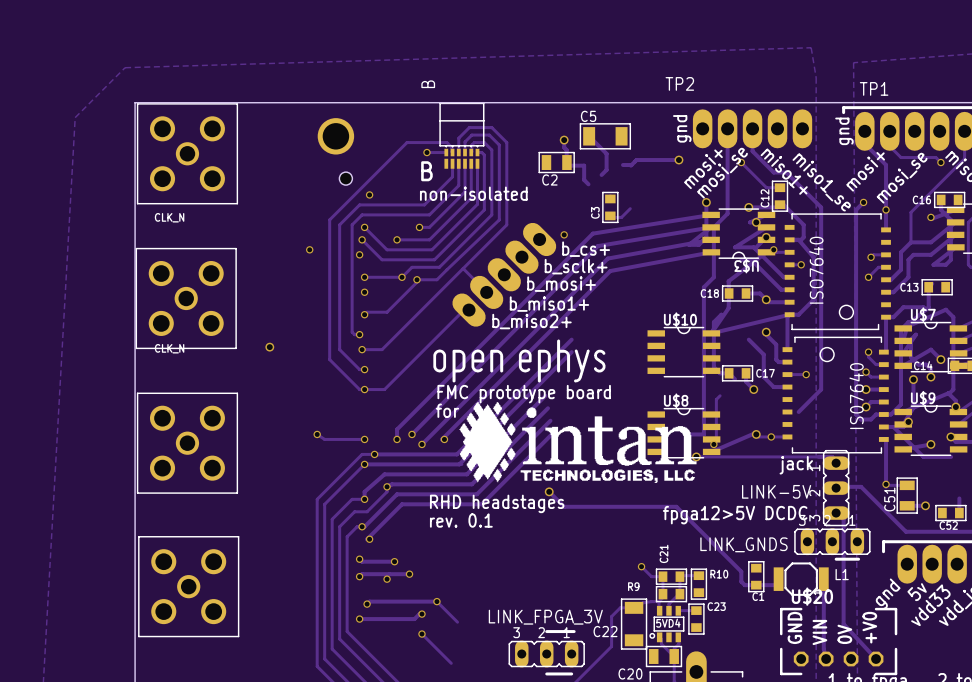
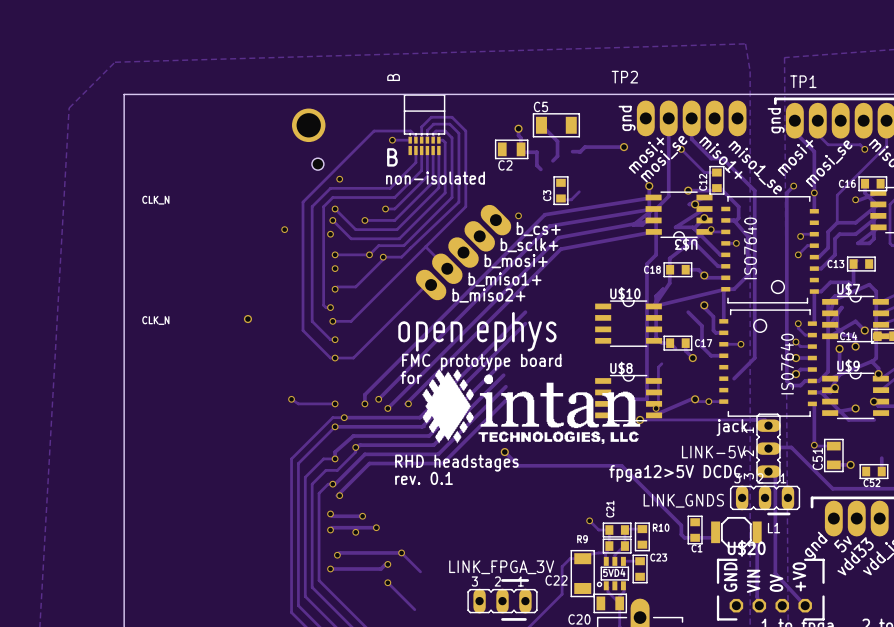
part: (187, 153) -> none
part: (186, 298) -> none
part: (187, 443) -> none
part: (188, 586) -> none

